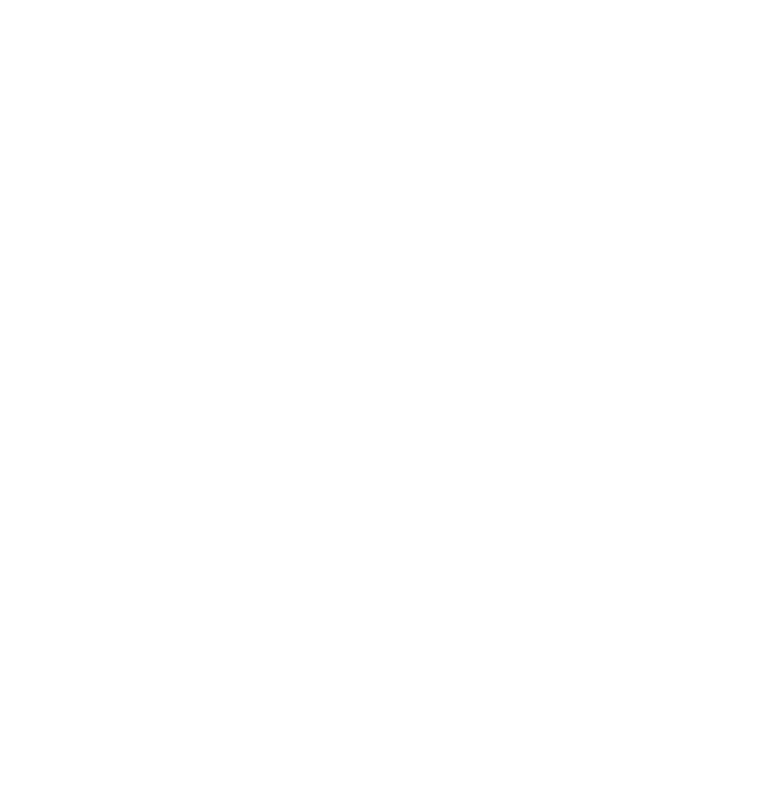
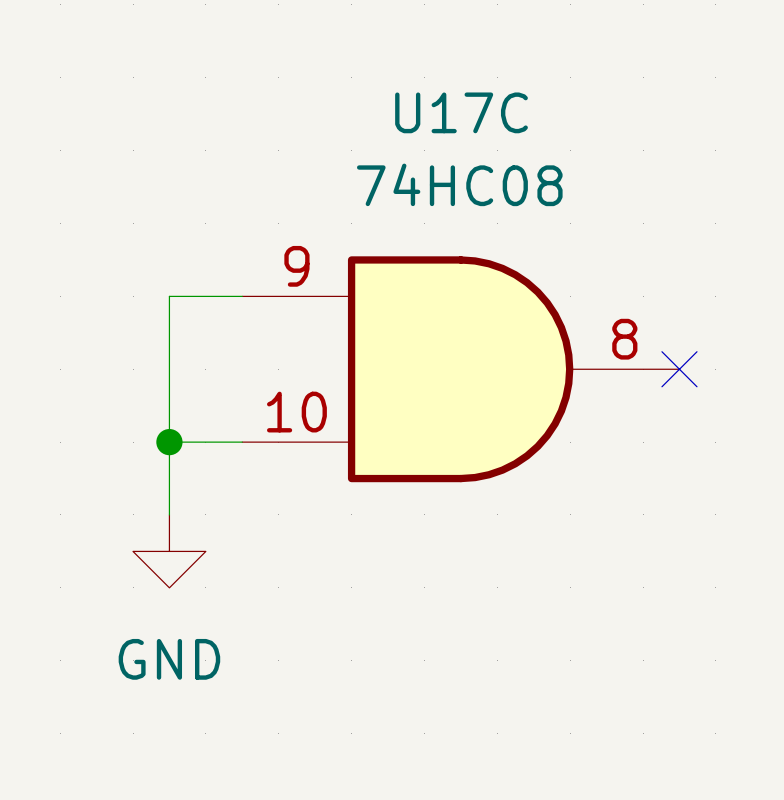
wire: none -> (242, 296) (169, 296) (169, 514)
U17C: none -> 74HC08 (460, 369)
no-connect mark: none -> (679, 369)
wire: none -> (169, 442) (242, 442)
junction: none -> (169, 442)
power symbol: none -> GND (169, 551)

